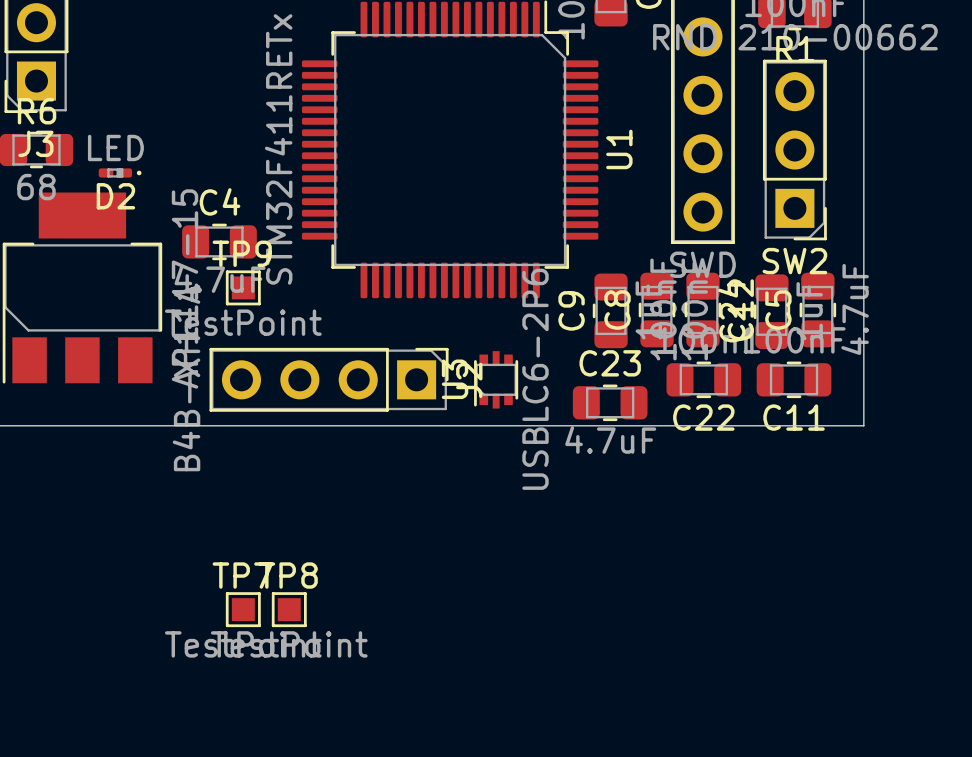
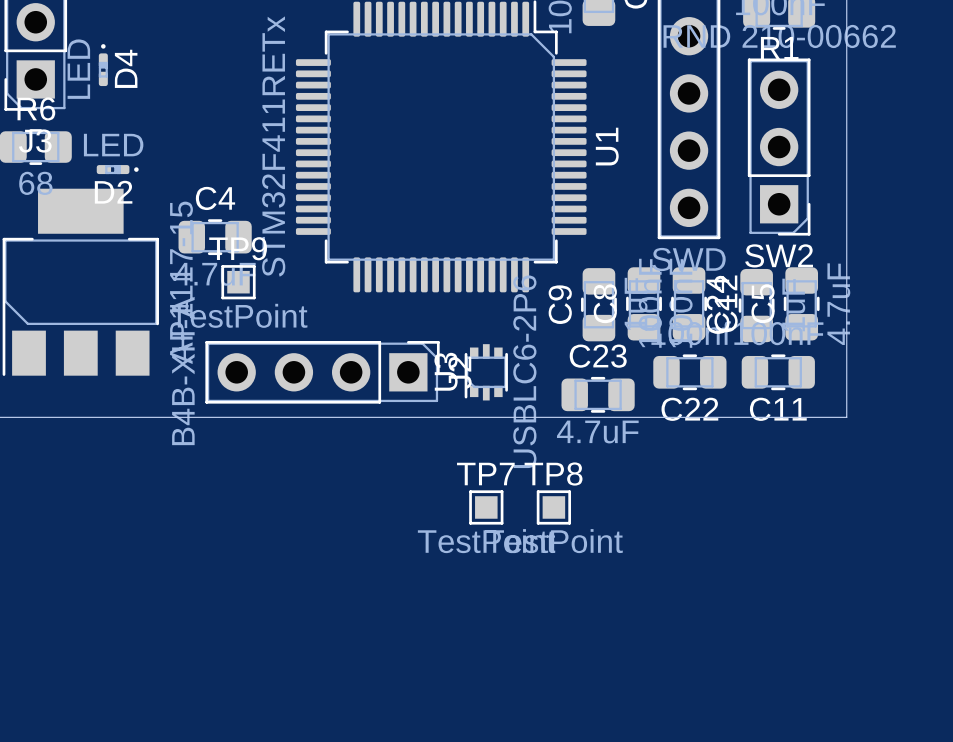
D4: none -> LED (103, 65)
TP7 position: (243, 609) -> (486, 507)
TP8 position: (289, 609) -> (553, 507)

